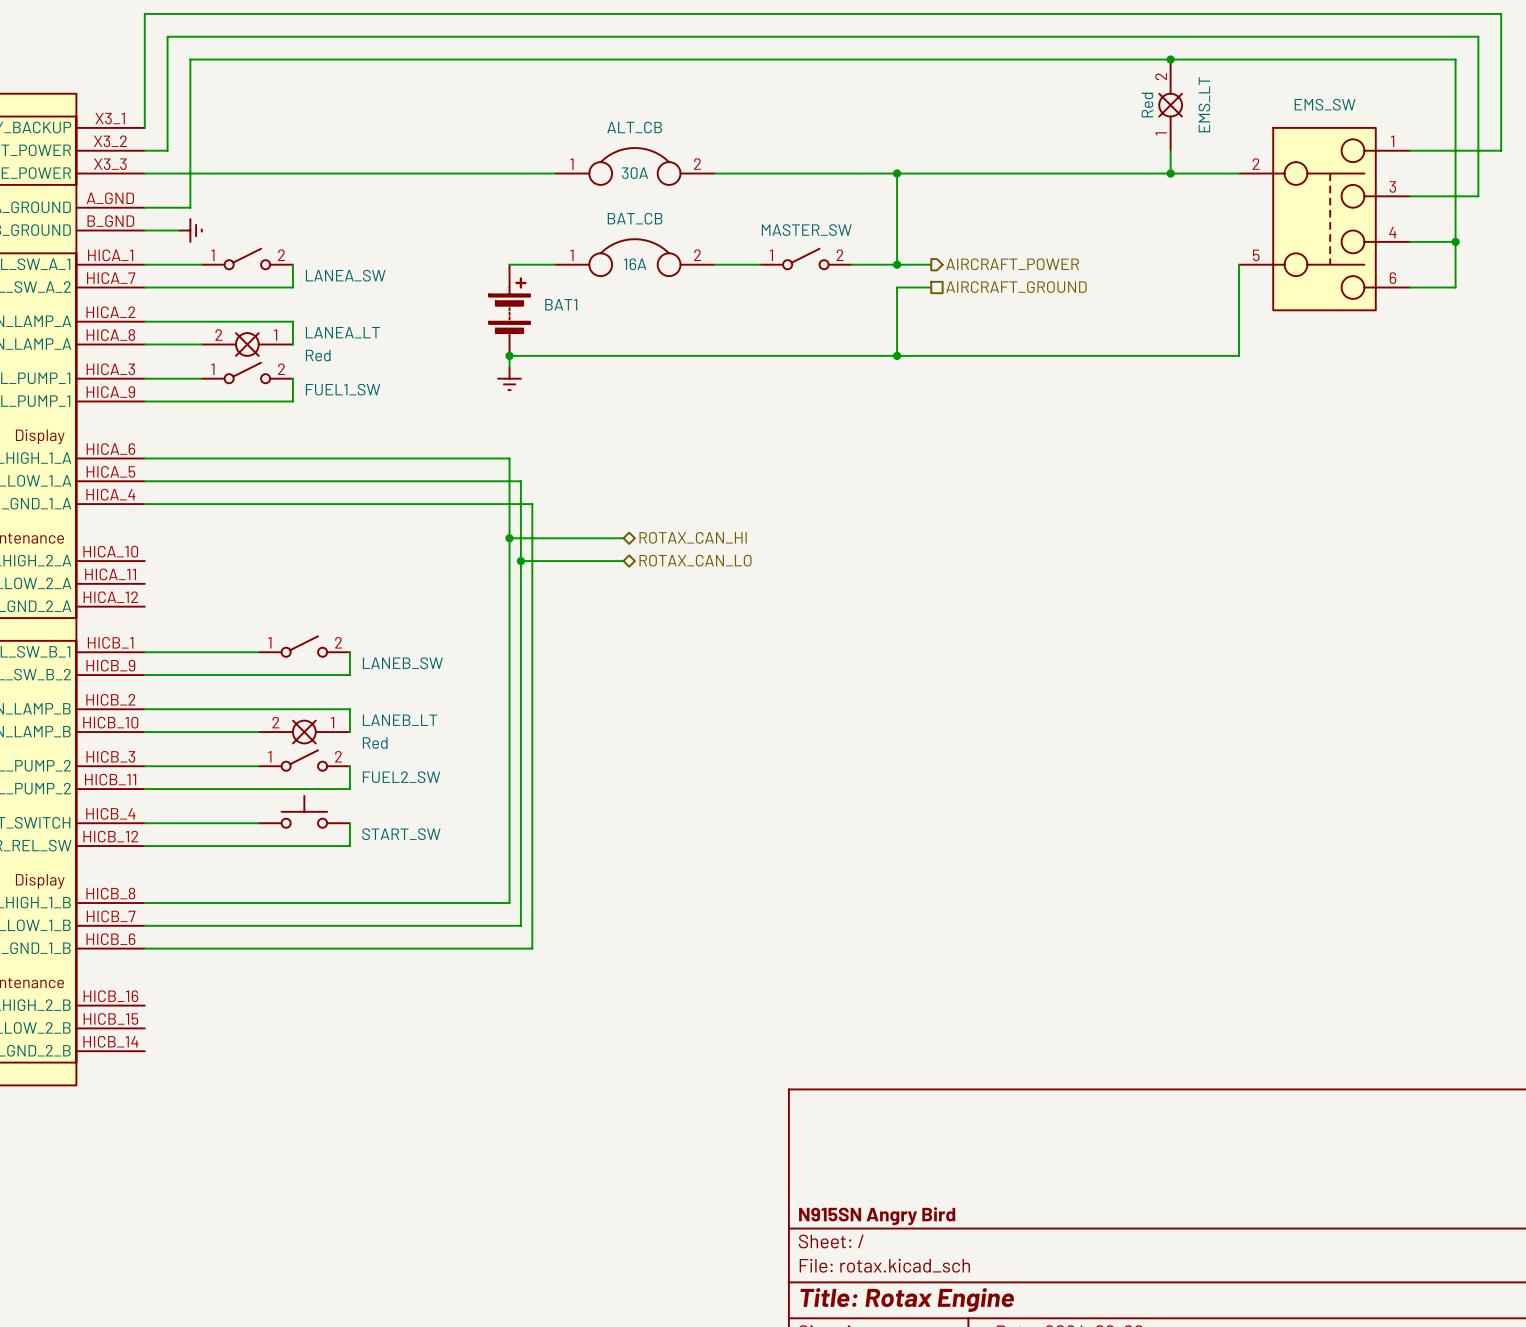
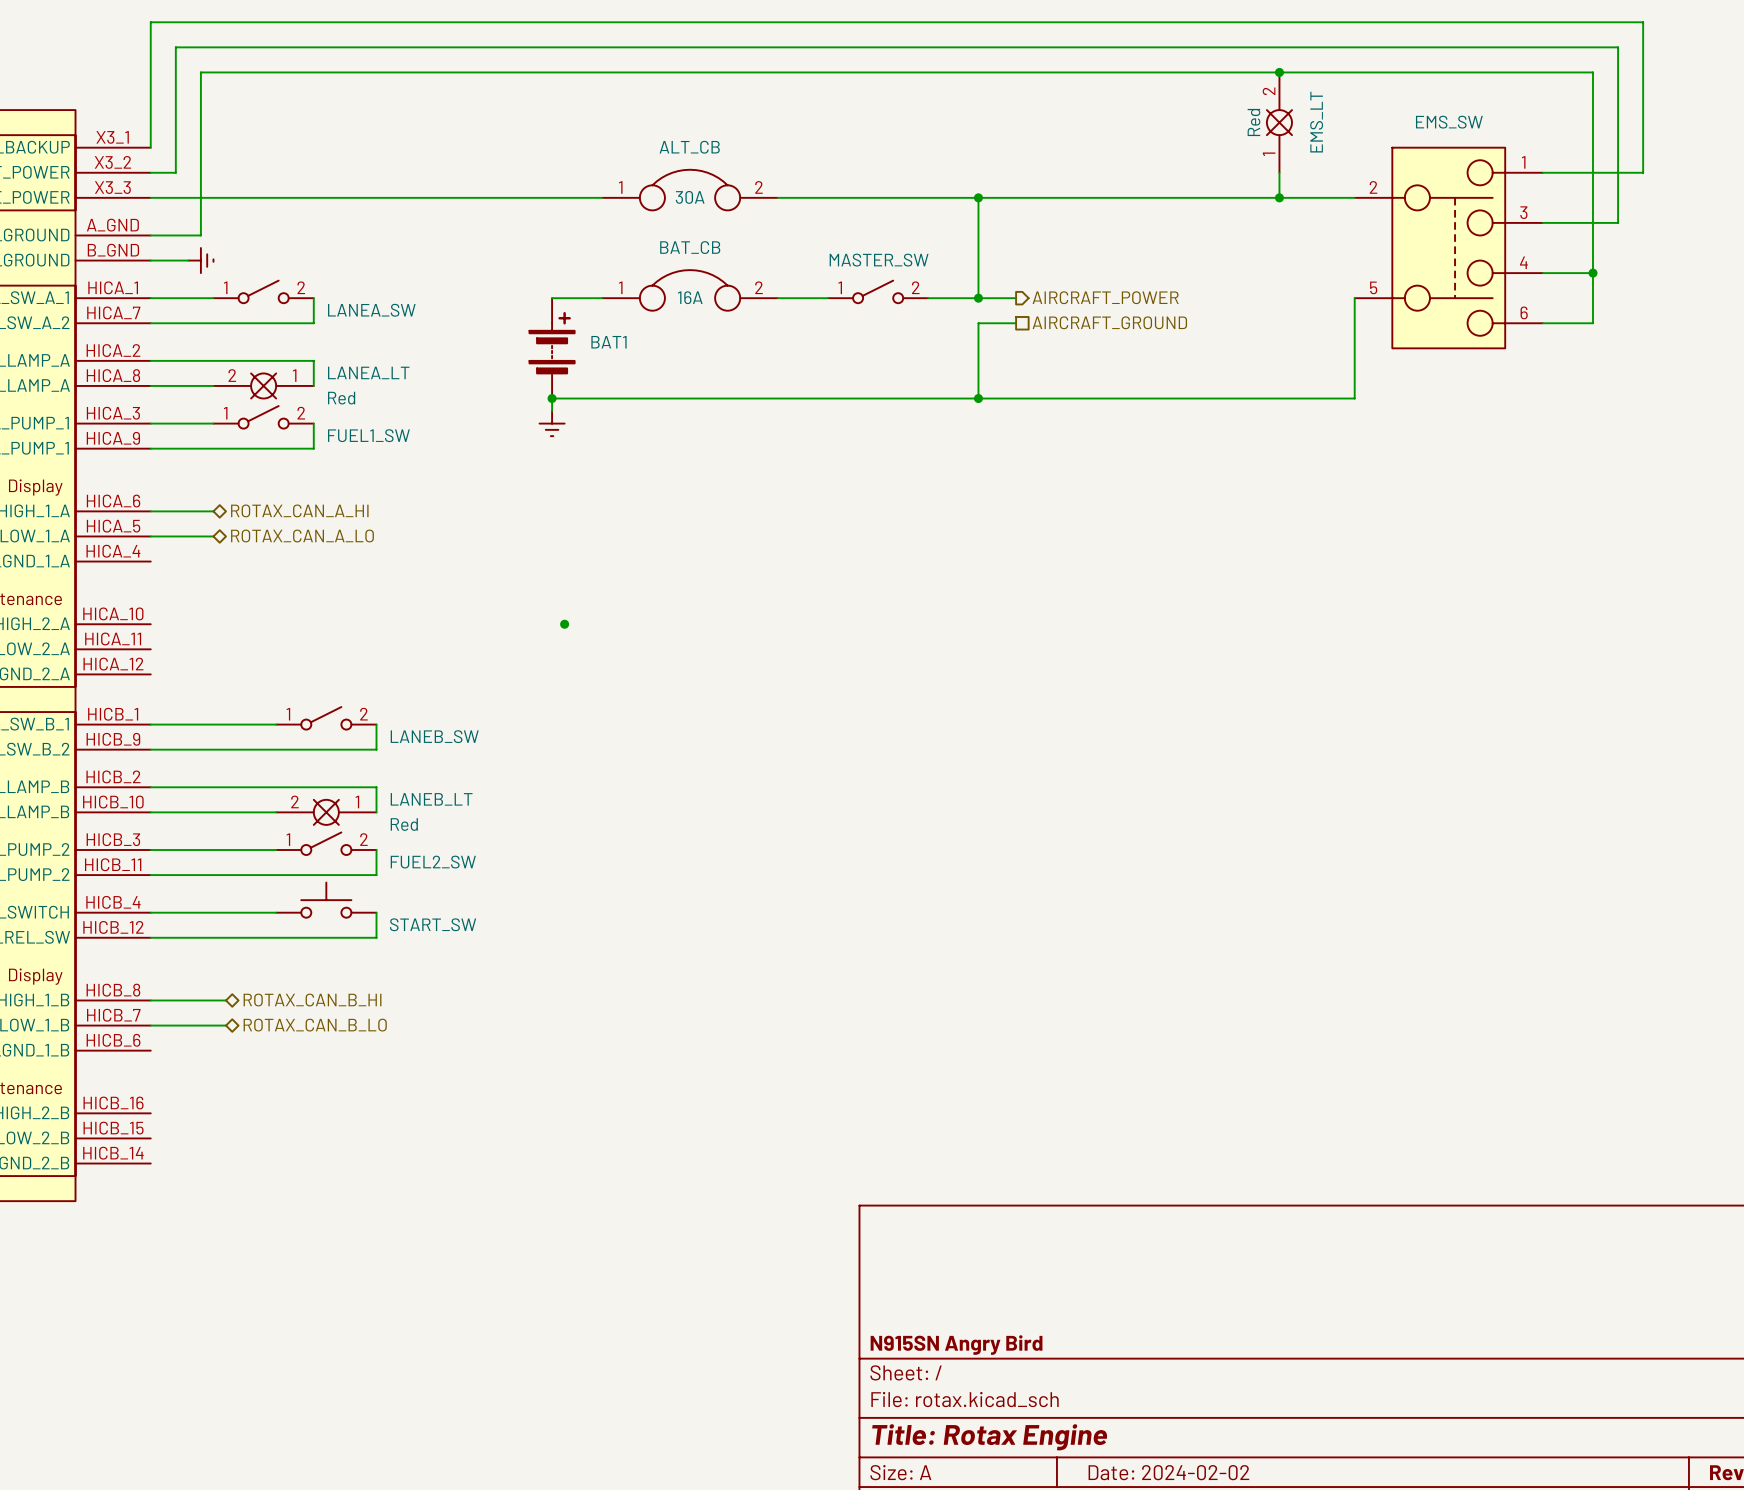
wire: (201, 458) (509, 458) (509, 903) (213, 903) -> none
hierarchical label: none -> ROTAX_CAN_A_HI (299, 510)
hierarchical label: none -> ROTAX_CAN_A_LO (302, 536)
wire: (201, 481) (520, 481) (520, 925) (213, 925) -> none
wire: (144, 504) (532, 504) (532, 948) (144, 948) -> none
hierarchical label: ROTAX_CAN_HI (693, 537) -> none
wire: (509, 538) (623, 538) -> none
junction: (509, 538) -> none
hierarchical label: ROTAX_CAN_LO (695, 560) -> none
wire: (520, 561) (623, 561) -> none
hierarchical label: none -> ROTAX_CAN_B_HI (312, 1000)
hierarchical label: none -> ROTAX_CAN_B_LO (315, 1025)

